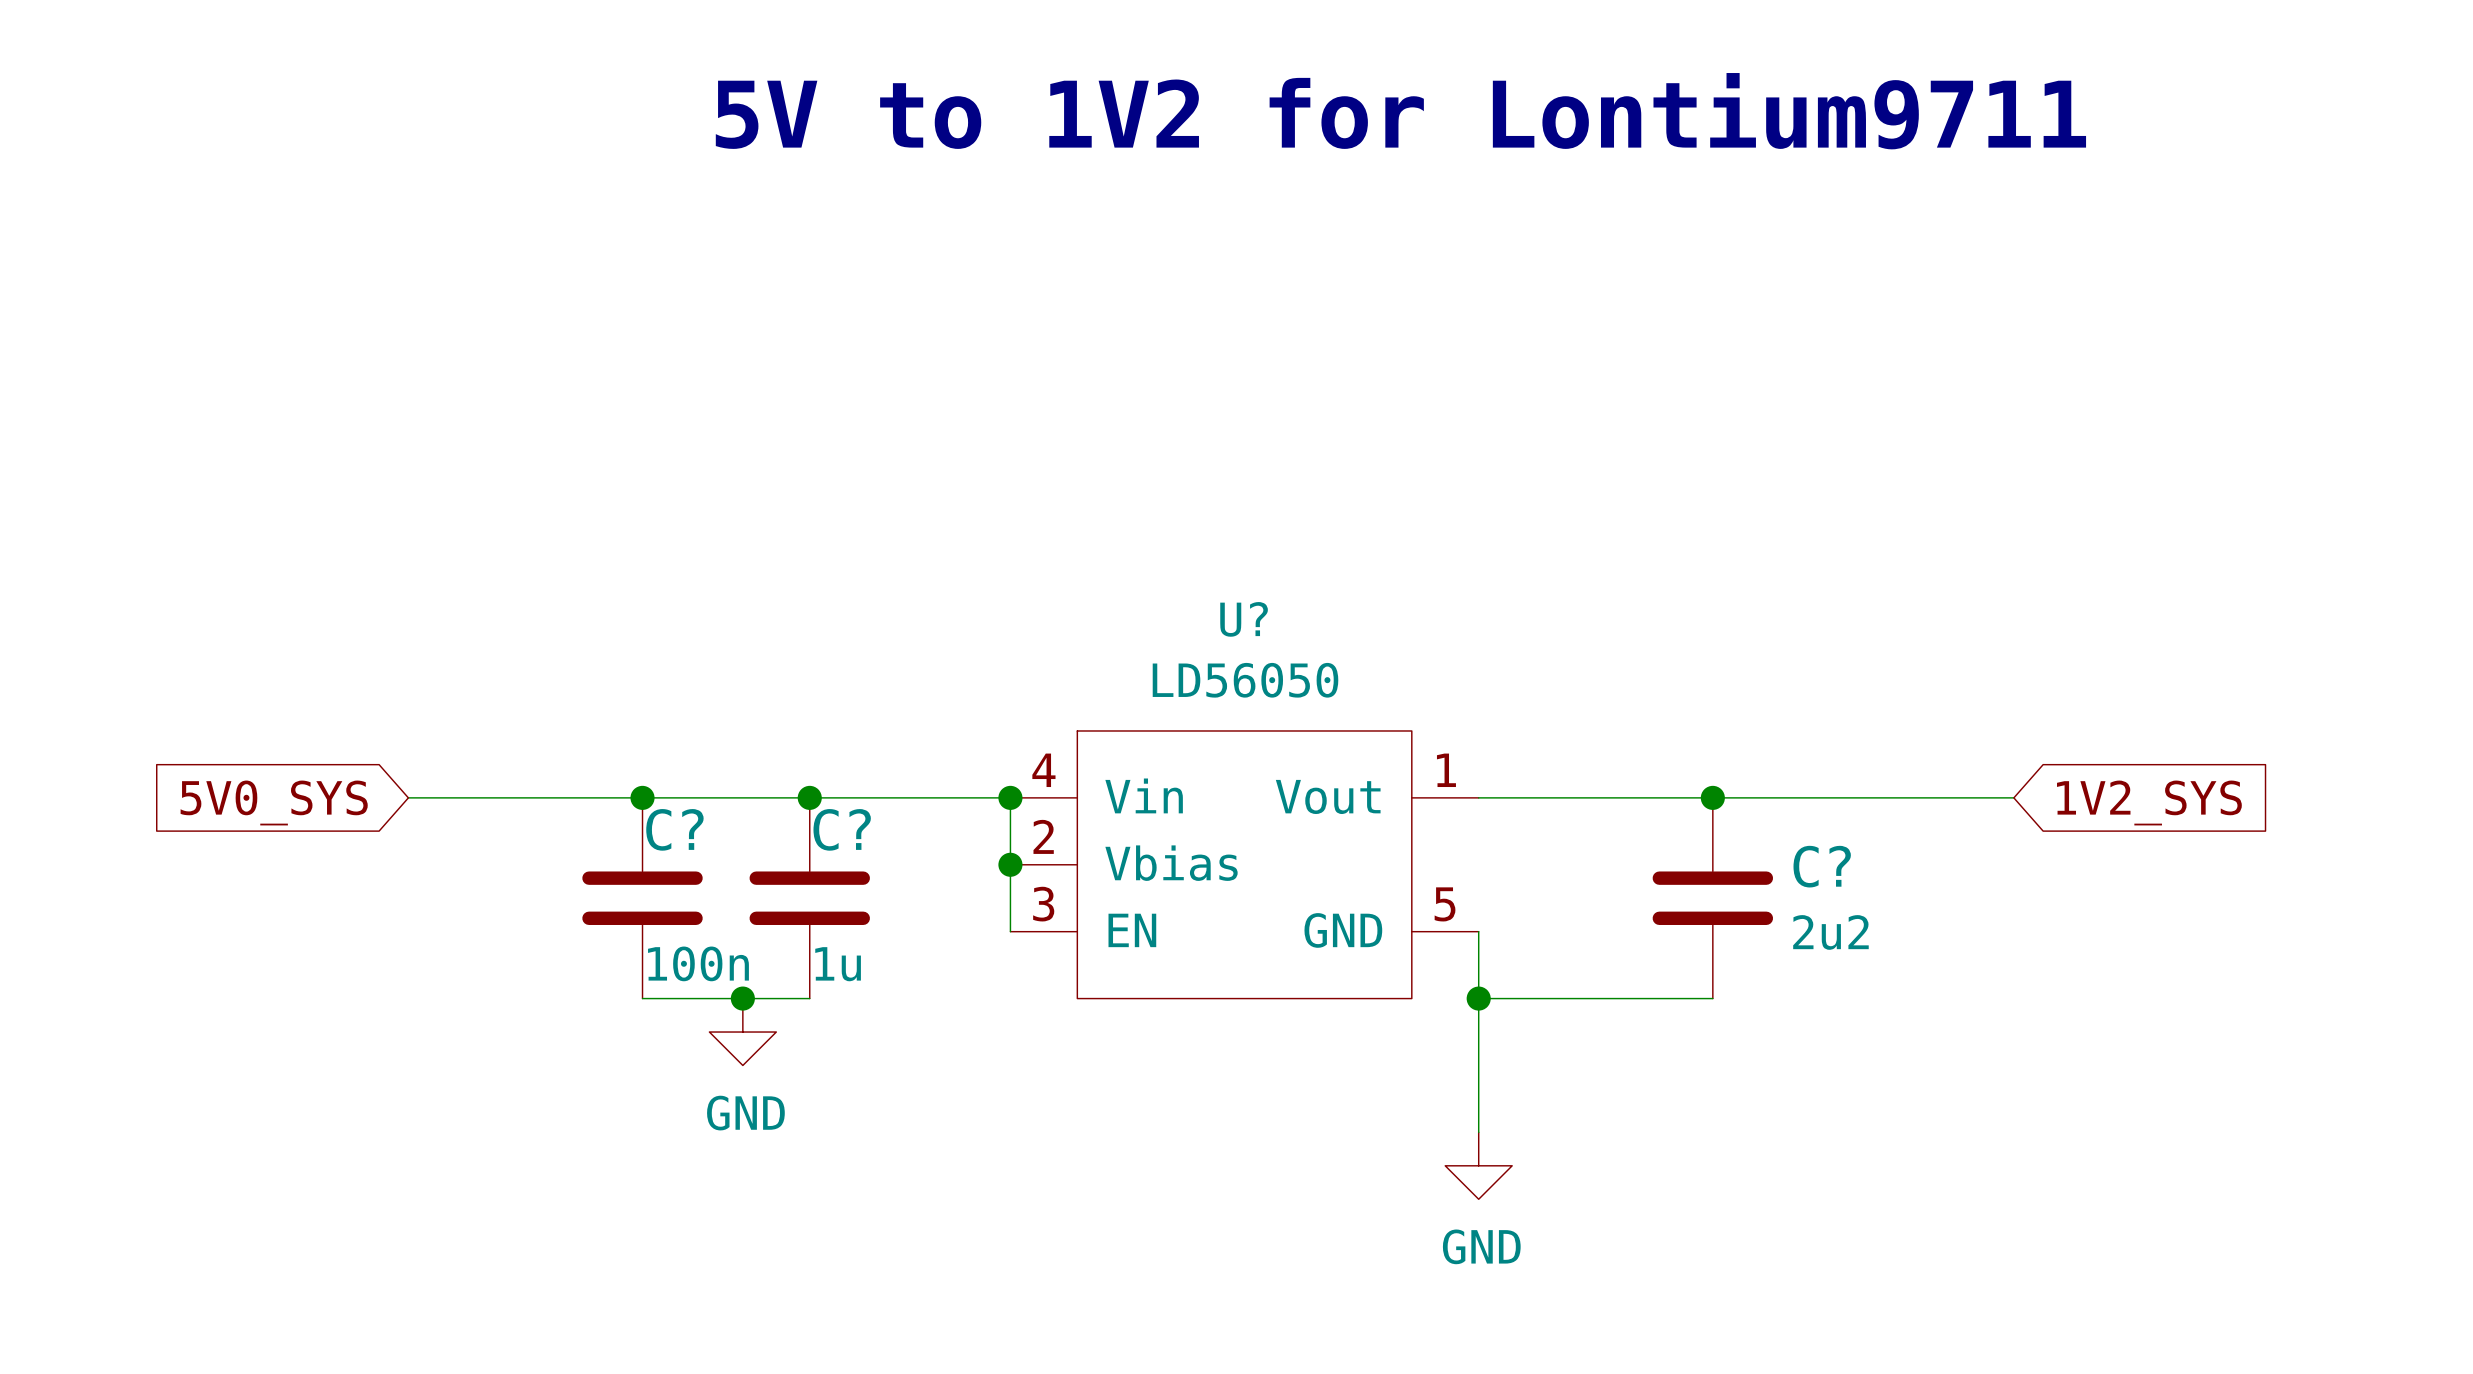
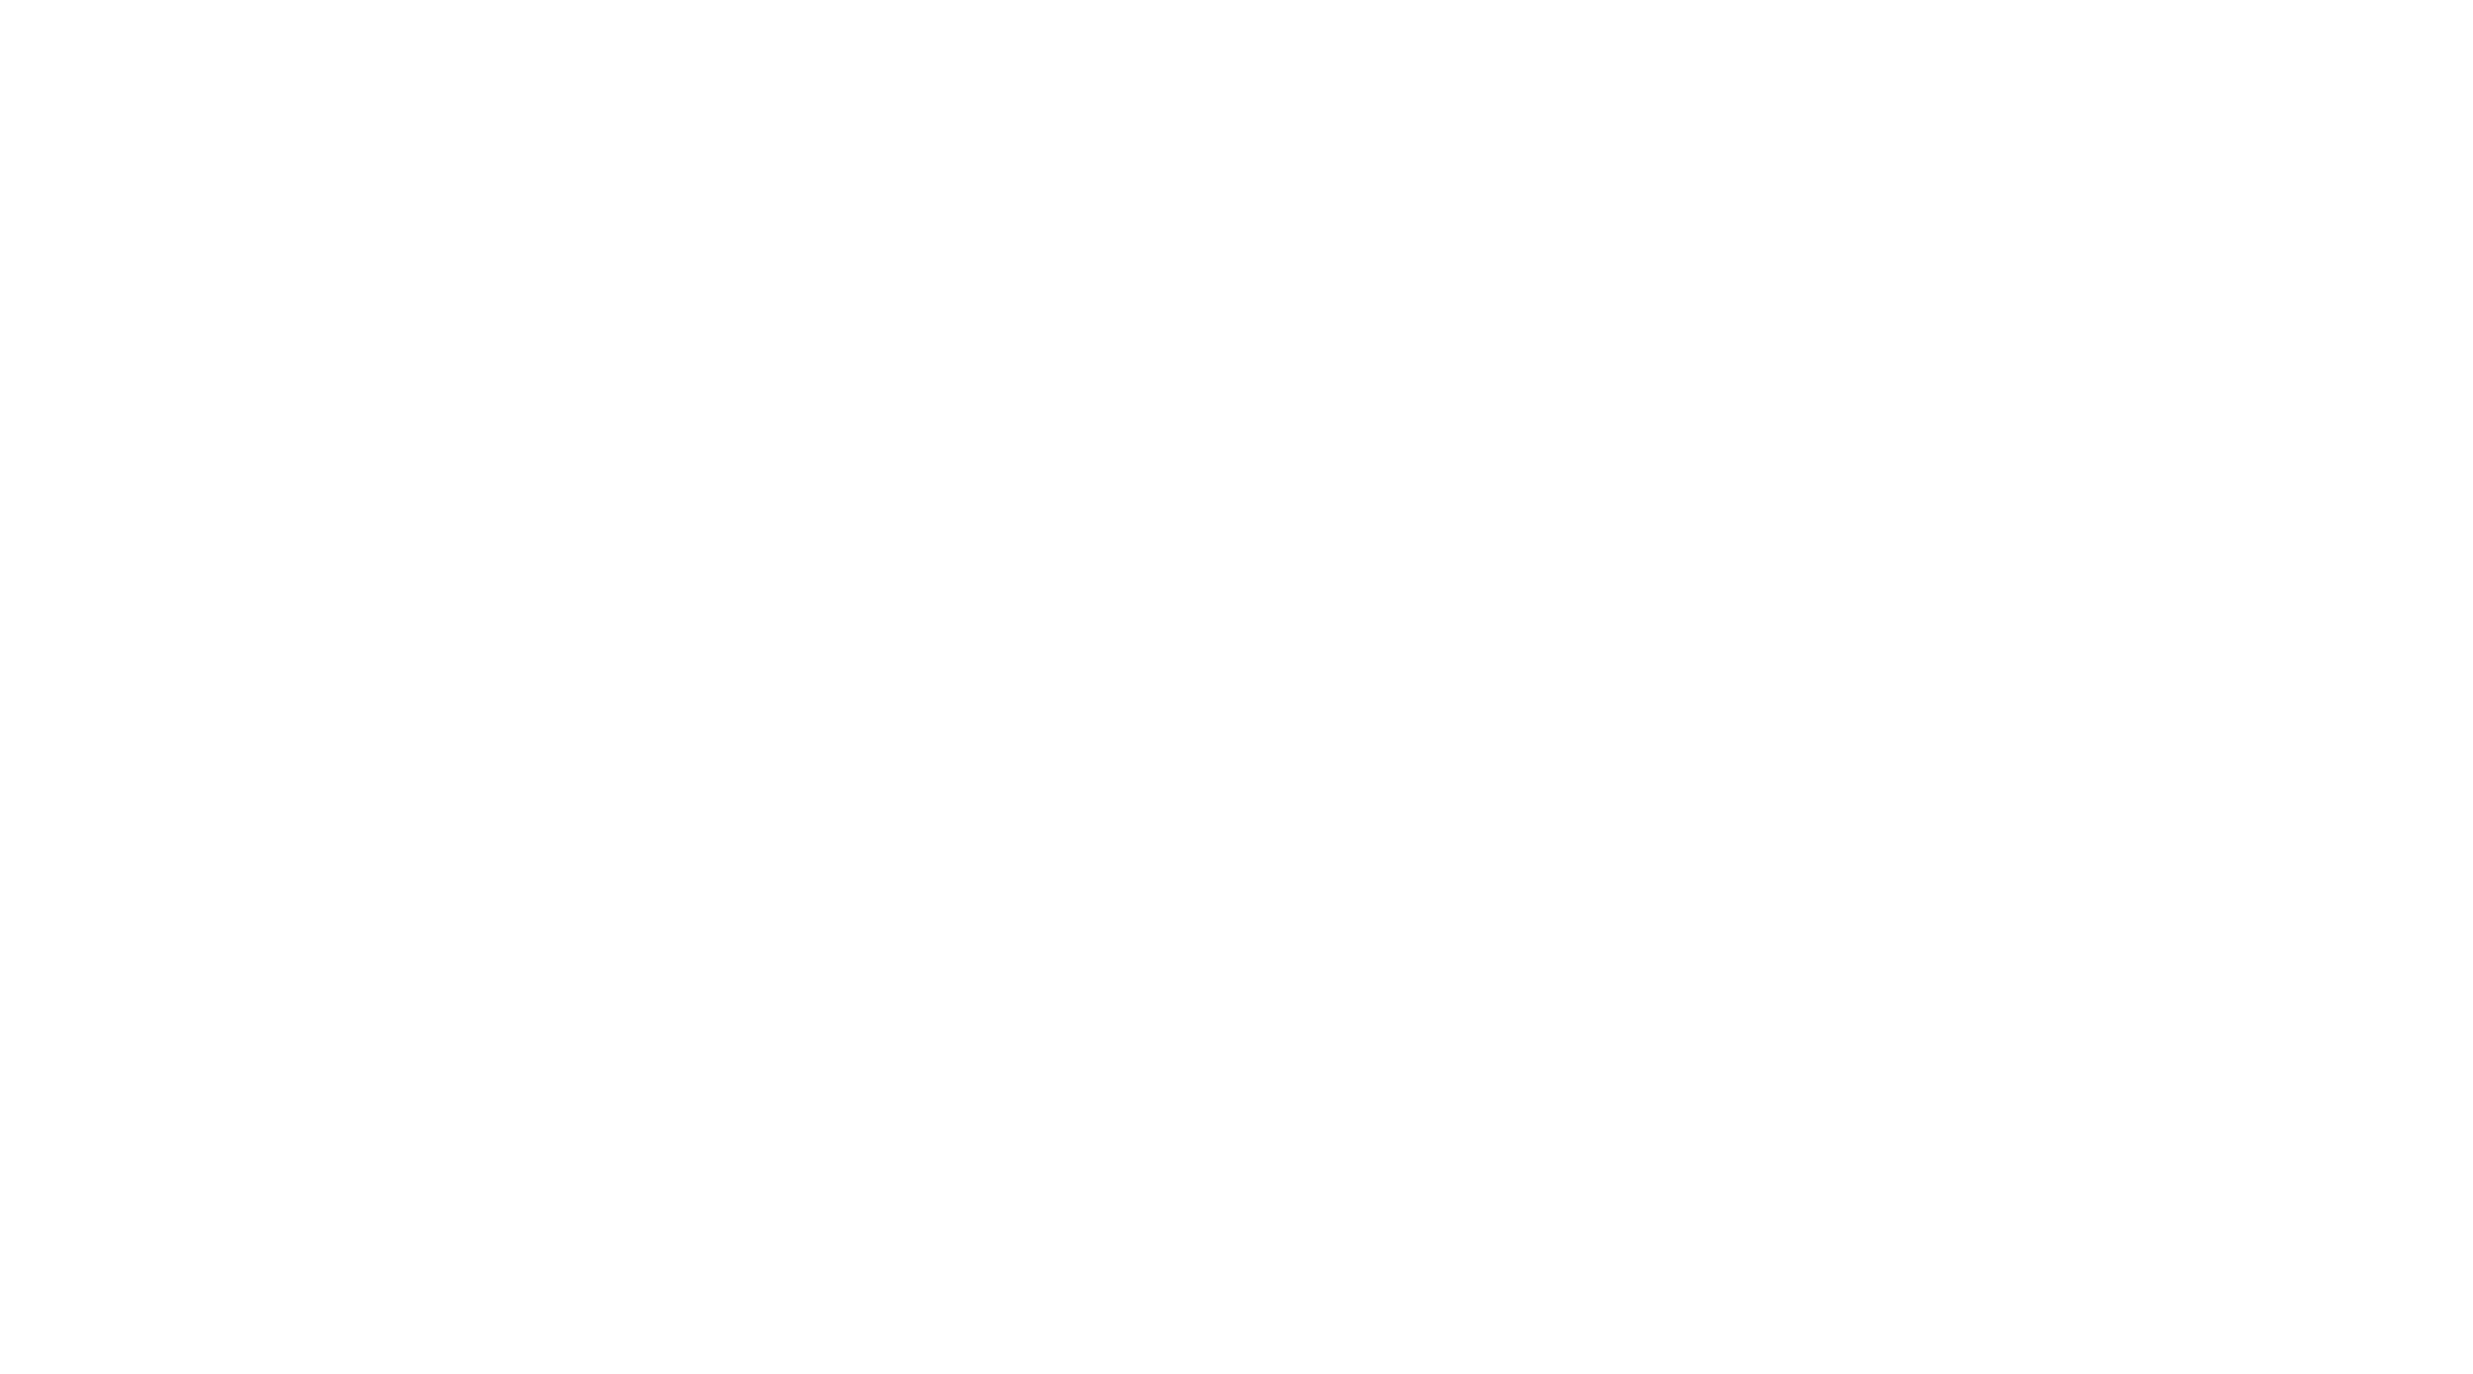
text: 5V to 1V2 for Lontium9711 (1400, 111) -> none
wire: (408, 797) (1010, 797) (1010, 931) -> none
junction: (642, 797) -> none
junction: (809, 797) -> none
junction: (1010, 797) -> none
wire: (1478, 797) (2013, 797) -> none
junction: (1712, 797) -> none
global label: 5V0_SYS (274, 802) -> none
global label: 1V2_SYS (2149, 802) -> none
junction: (1010, 864) -> none
U?: LD56050 (1244, 864) -> none
C?: (642, 898) -> none
C?: (809, 898) -> none
C?: (1712, 898) -> none
wire: (1478, 931) (1478, 1132) -> none
wire: (642, 998) (809, 998) -> none
junction: (742, 998) -> none
wire: (1478, 998) (1712, 998) -> none
junction: (1478, 998) -> none
power symbol: GND (742, 1032) -> none
power symbol: GND (1478, 1165) -> none

